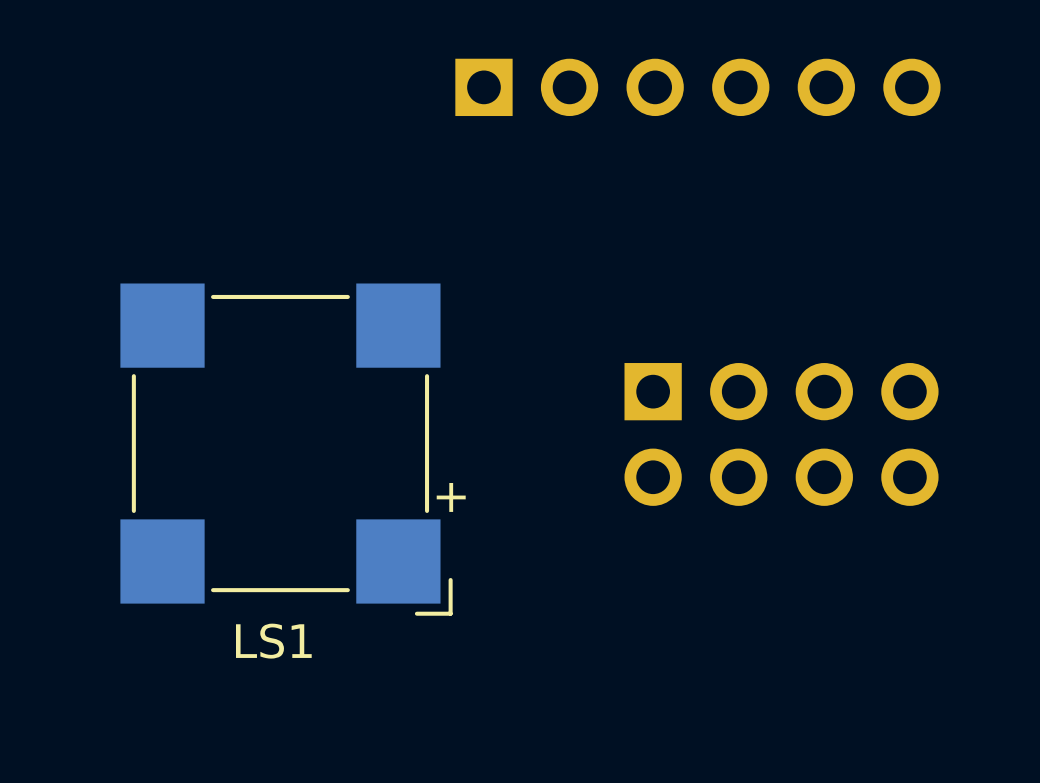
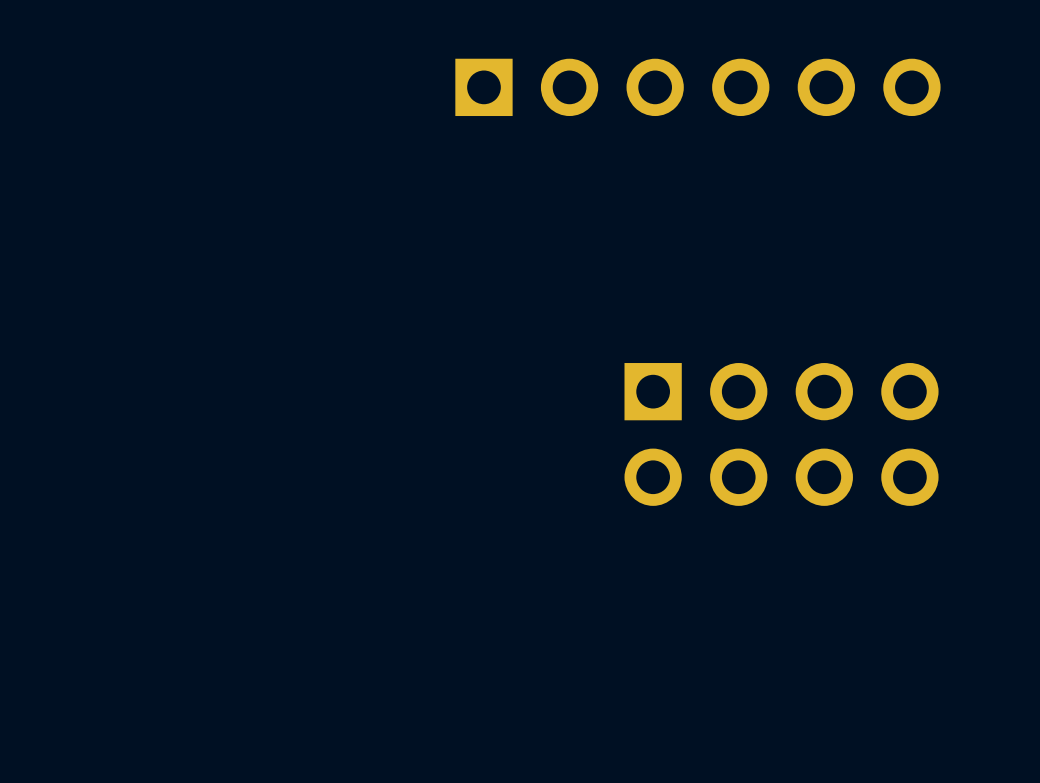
LS1: (286, 449) -> none

